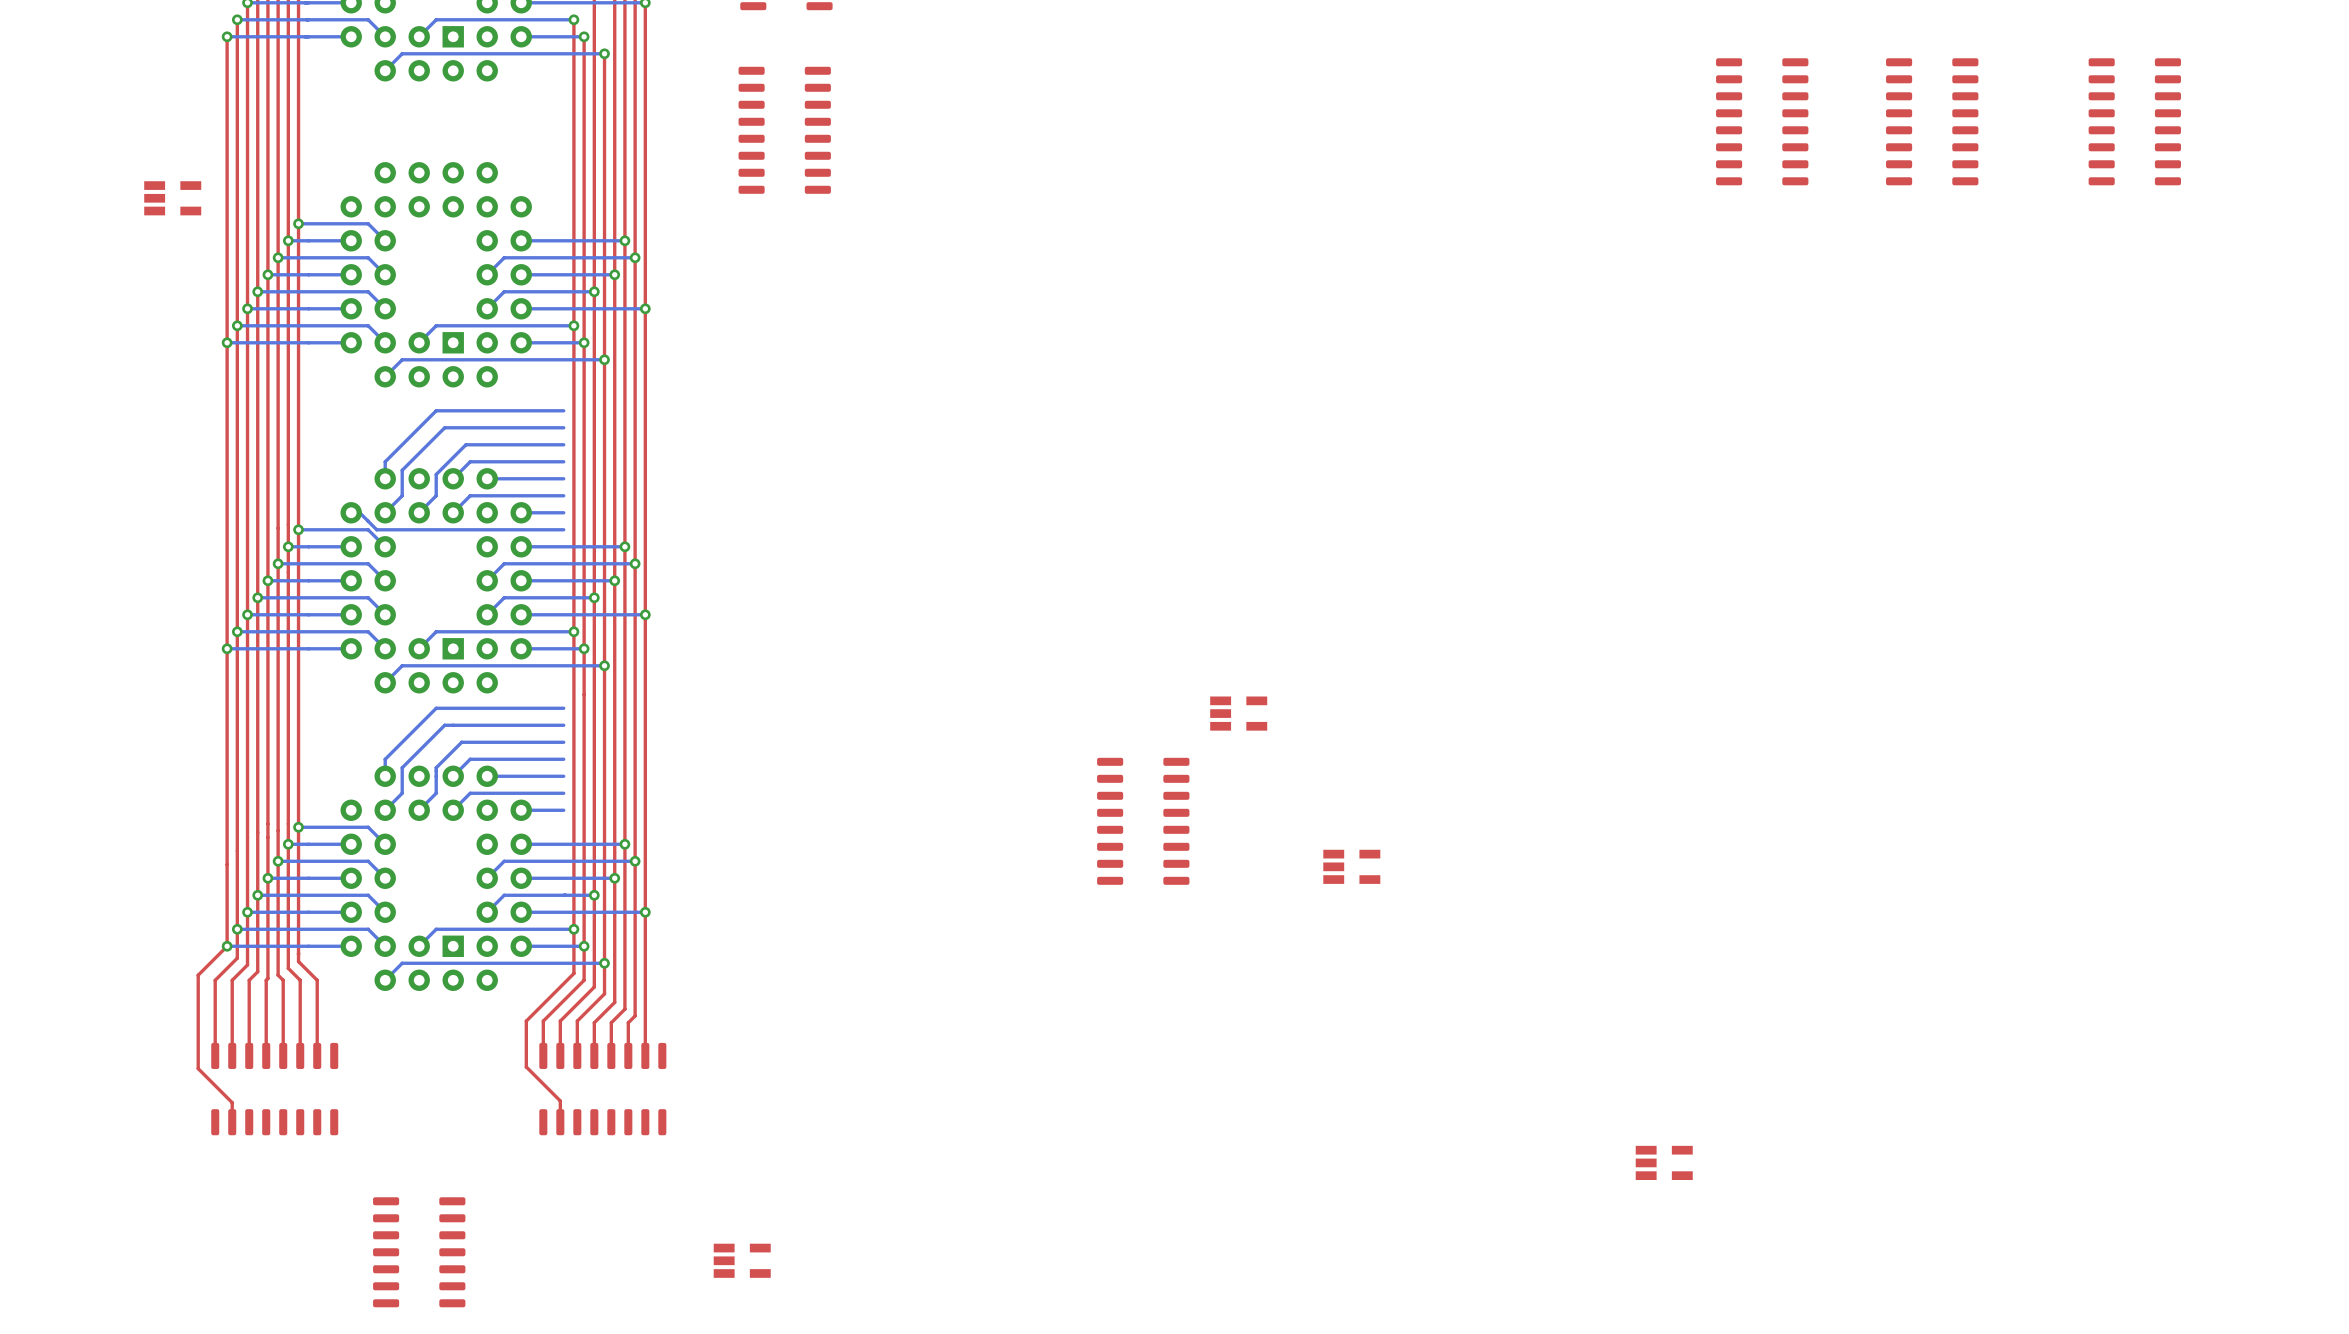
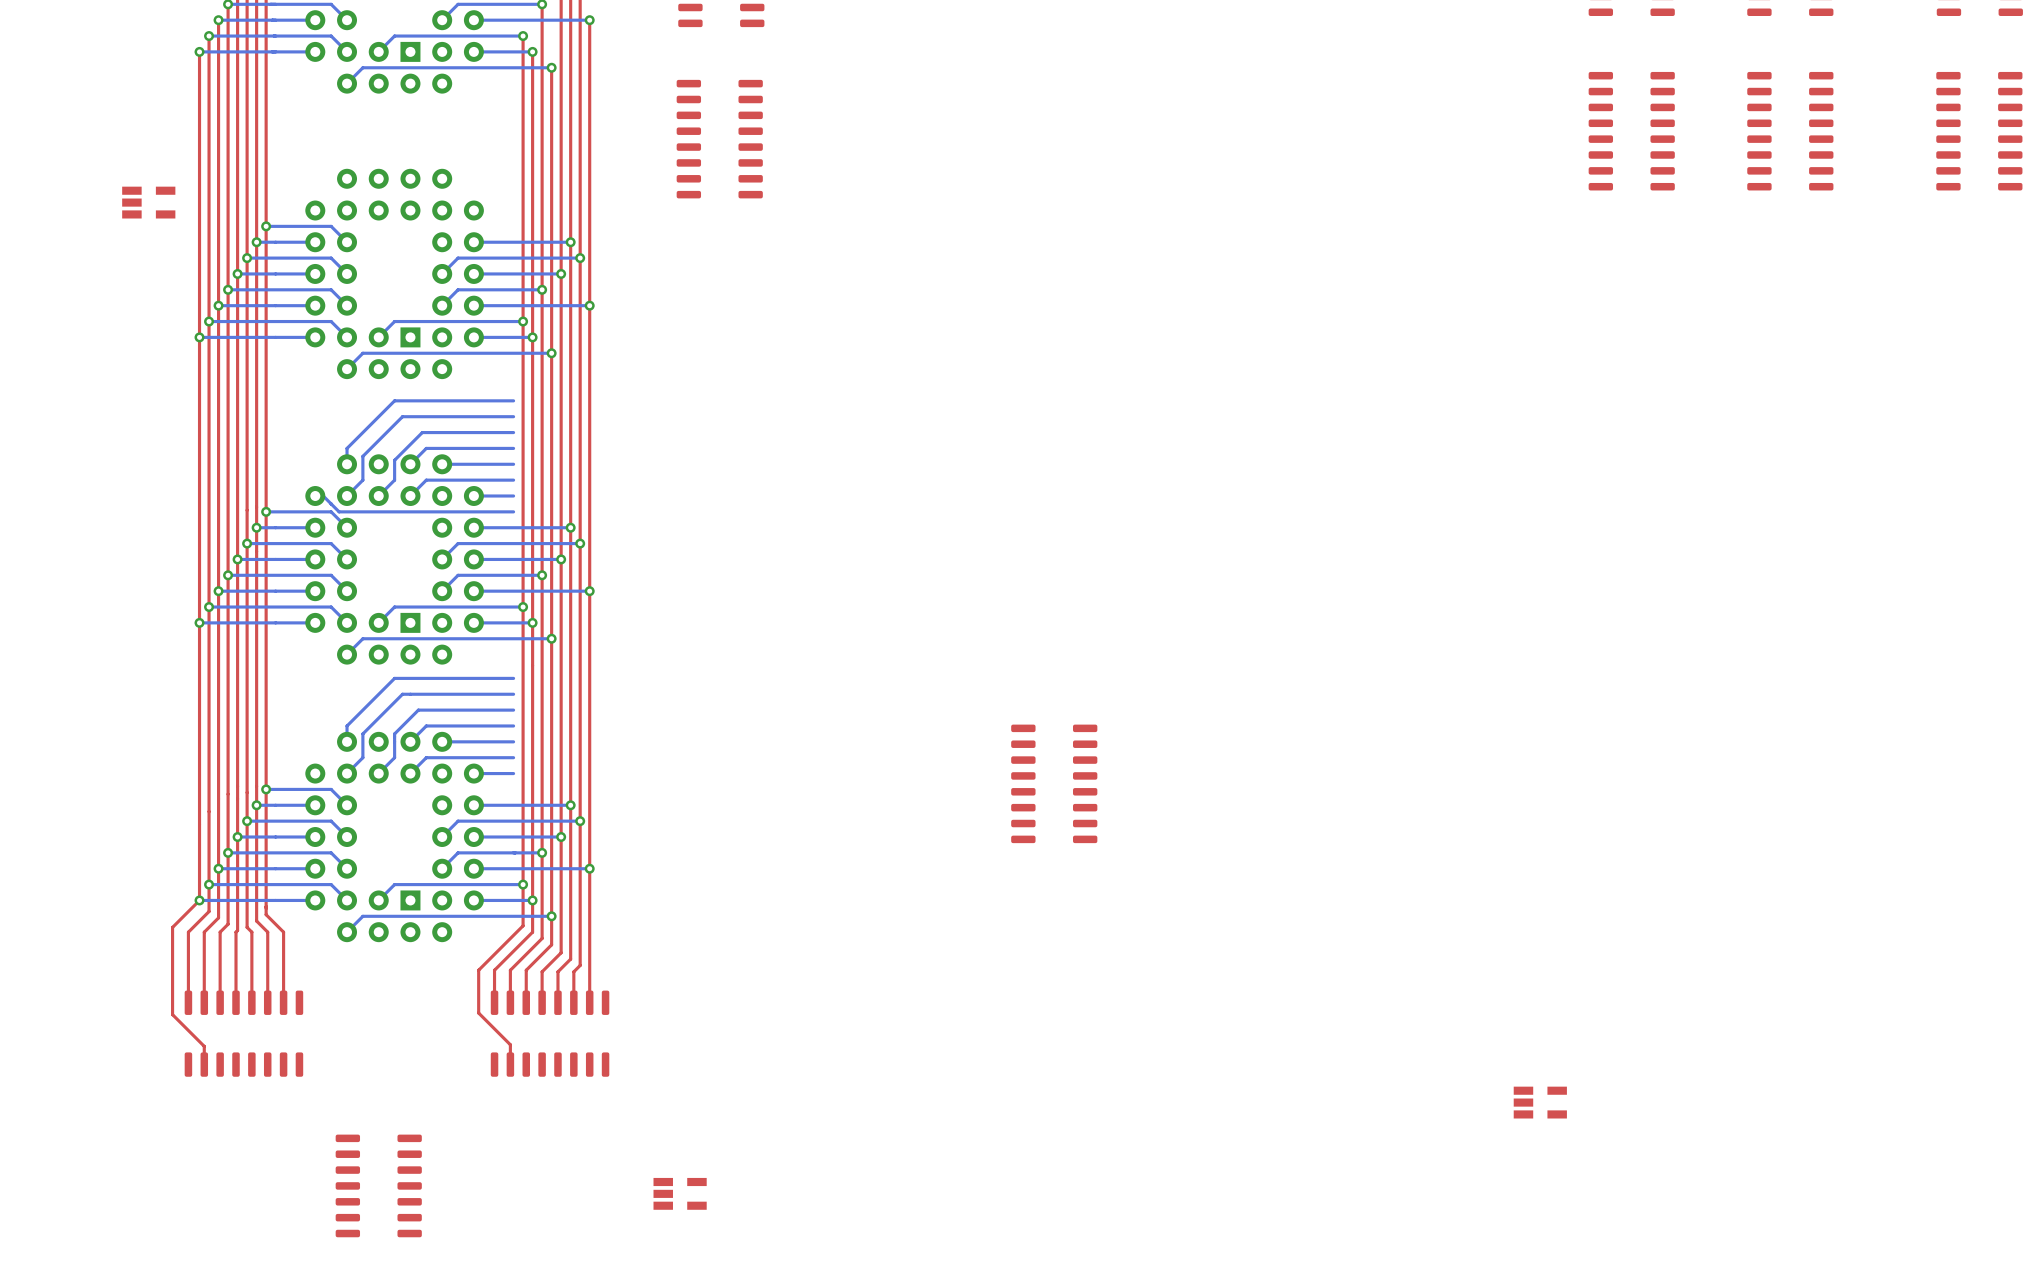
part: (1238, 713) -> none
part: (1351, 866) -> none

